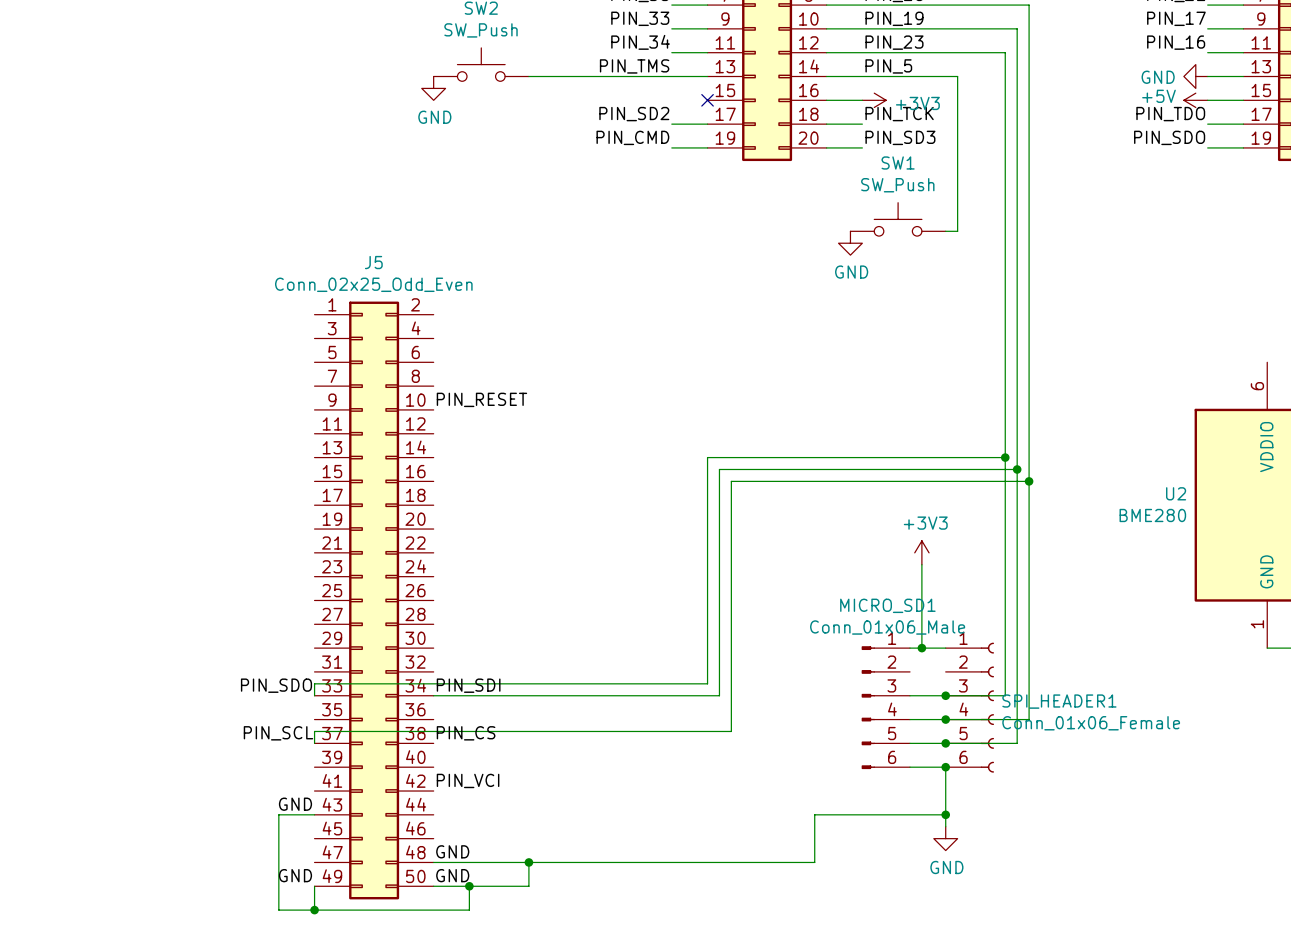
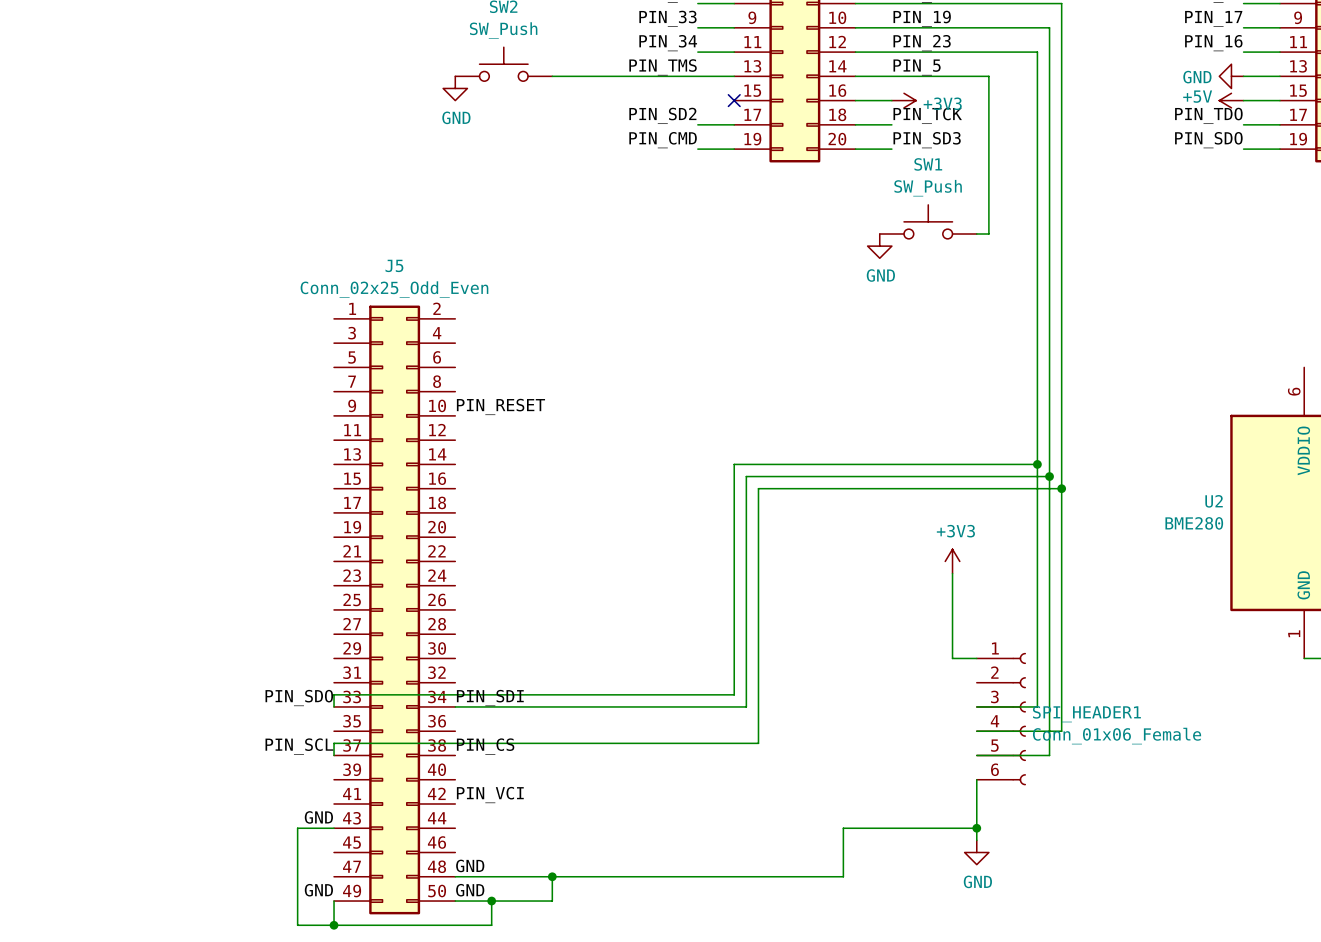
wire: (909, 648) (921, 648) -> none
junction: (921, 648) -> none
wire: (909, 695) (945, 695) -> none
junction: (945, 695) -> none
MICRO_SD1: Conn_01x06_Male (885, 707) -> none
wire: (909, 719) (945, 719) -> none
junction: (945, 719) -> none
wire: (909, 743) (945, 743) -> none
junction: (945, 743) -> none
wire: (909, 767) (945, 767) -> none
junction: (945, 767) -> none

